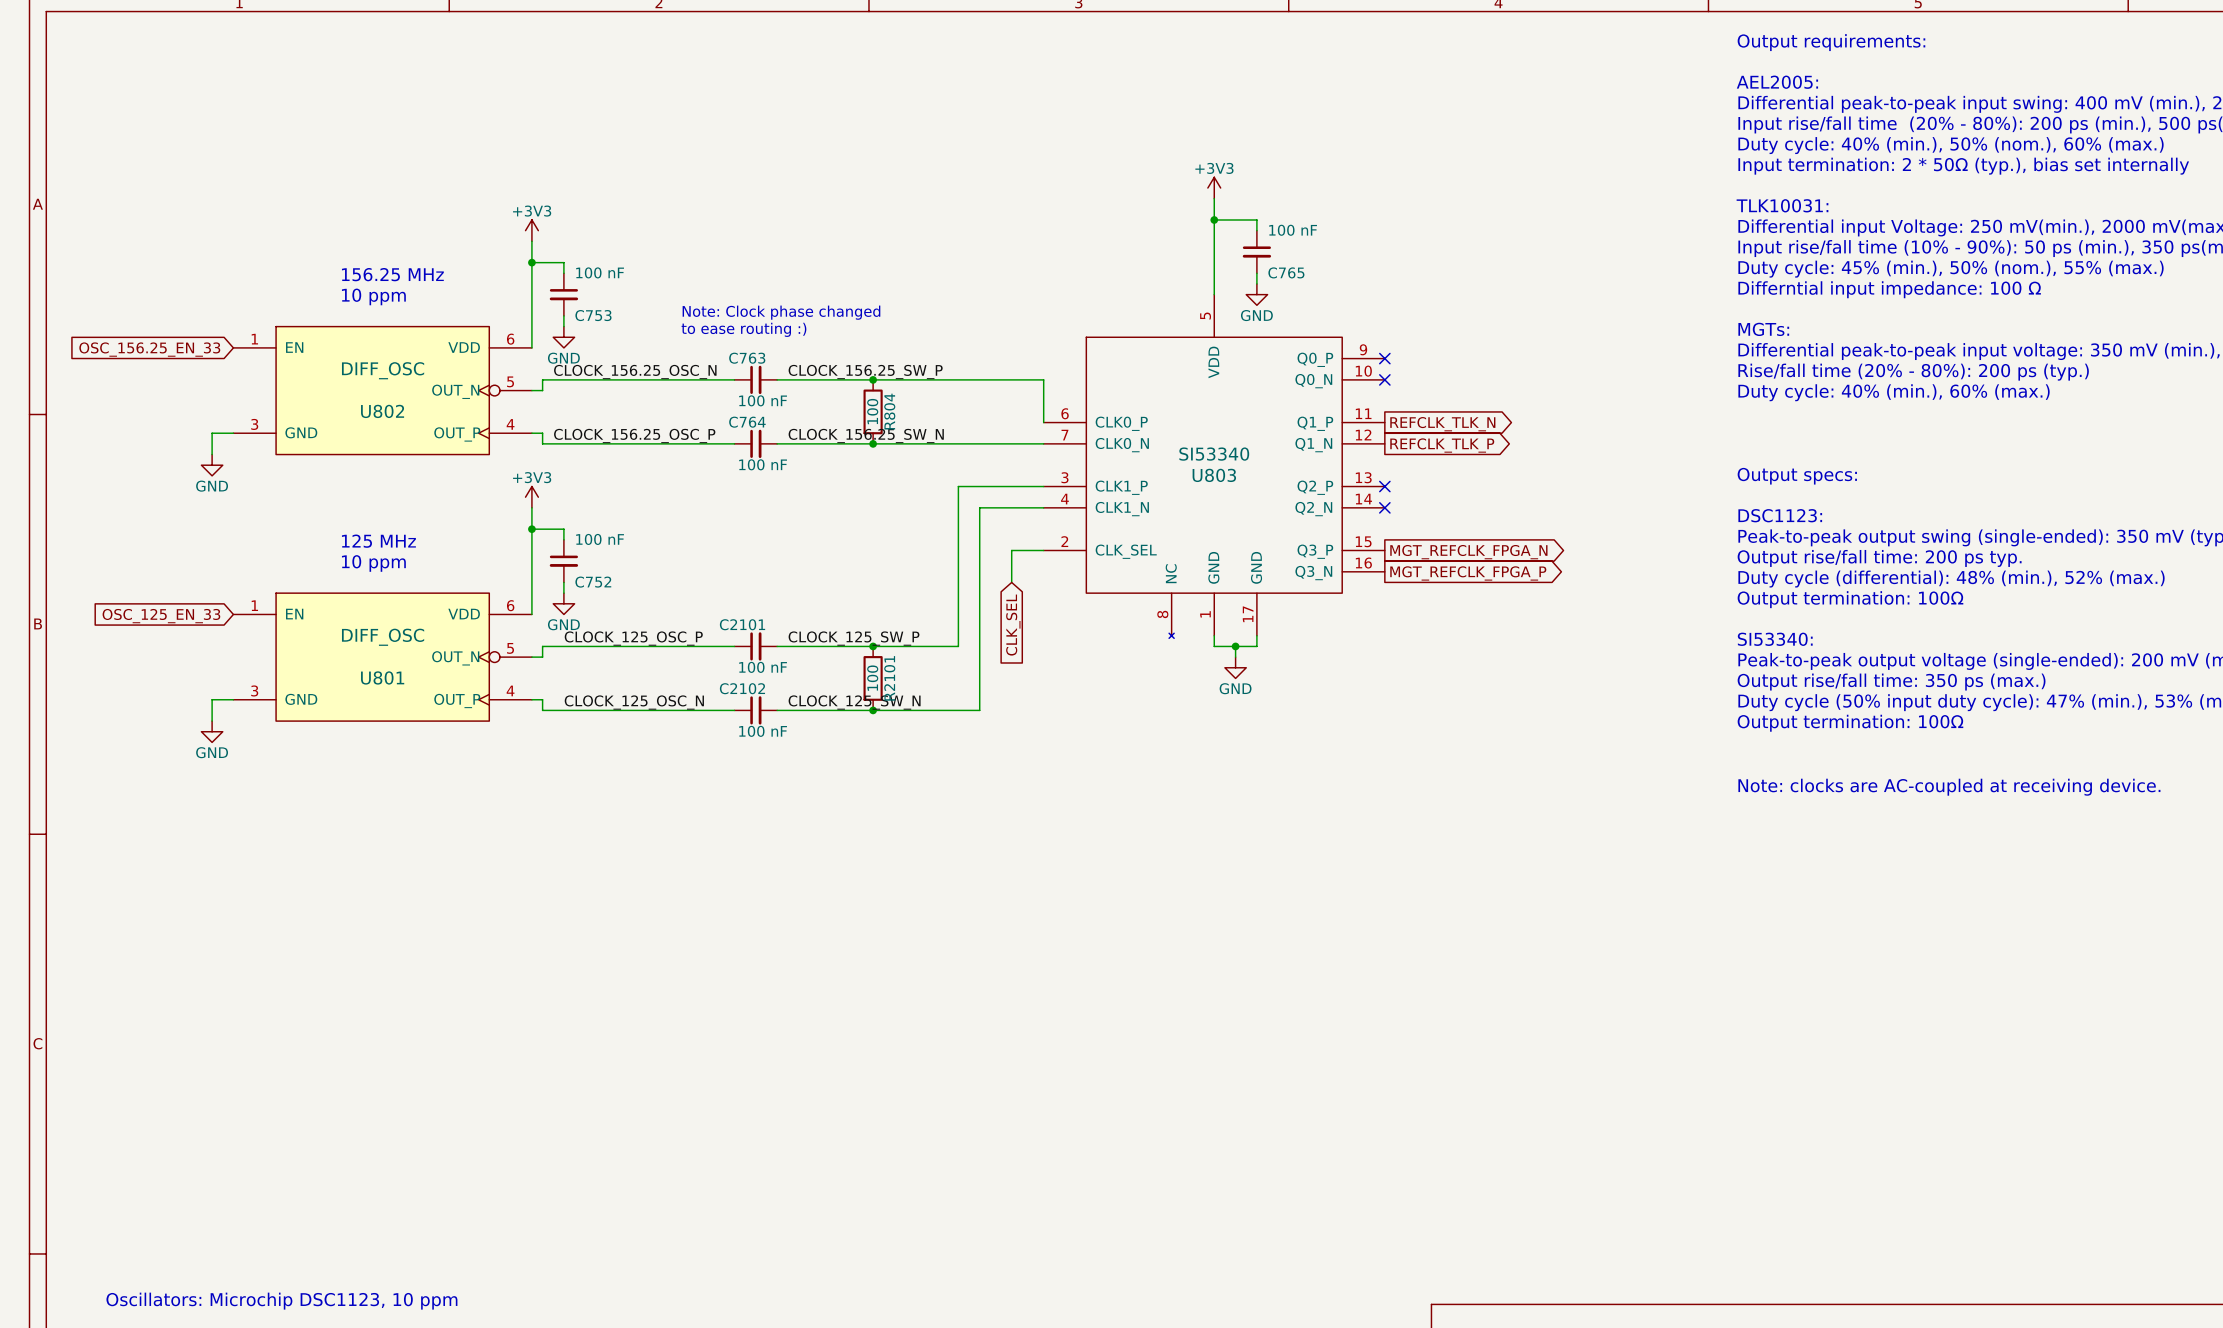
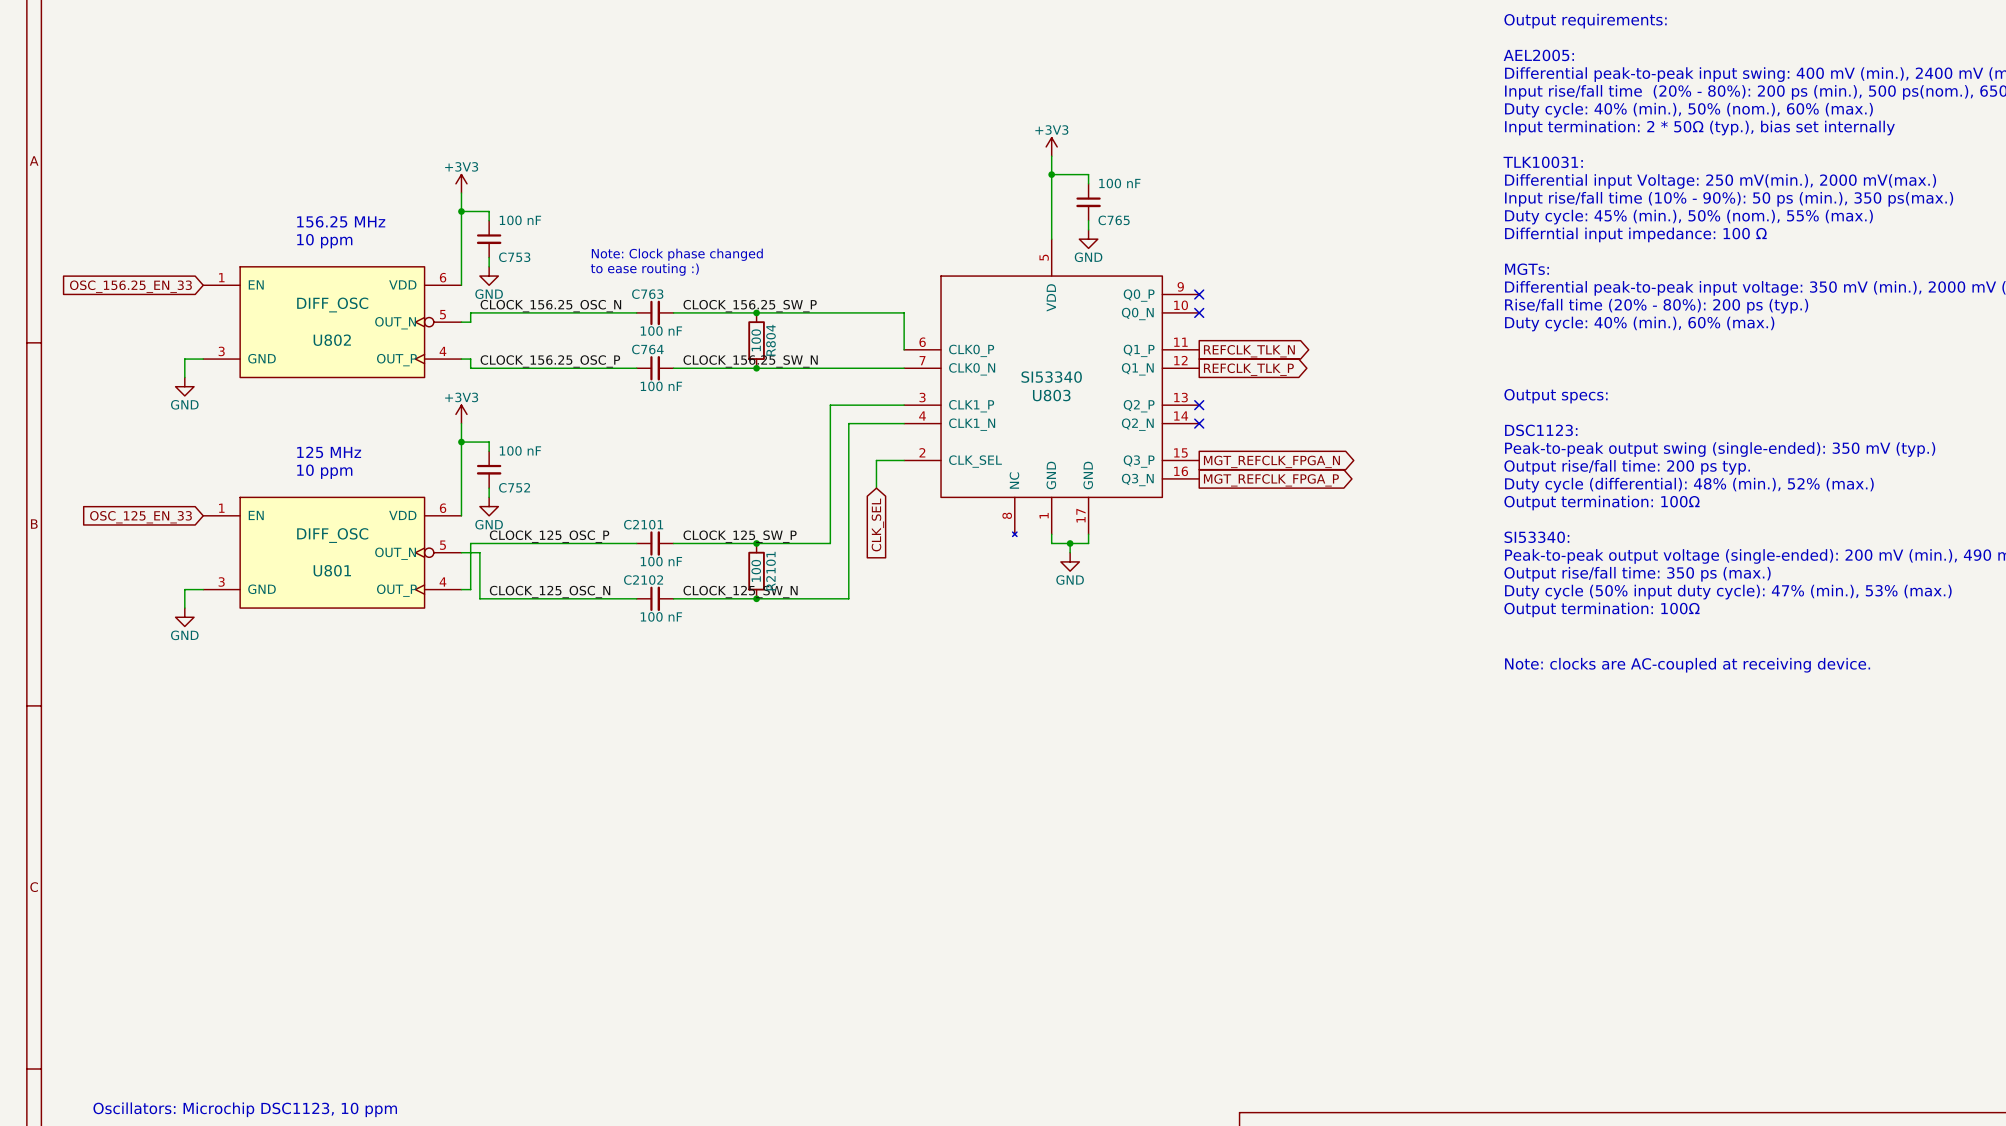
wire: (542, 699) (542, 710) (553, 710) -> (470, 589) (470, 552) (479, 552) (479, 598)

